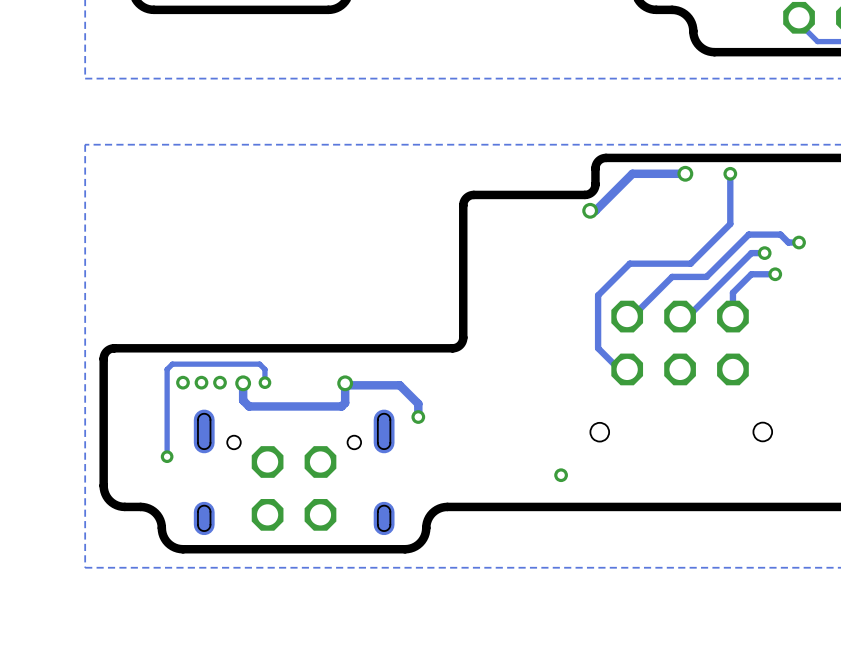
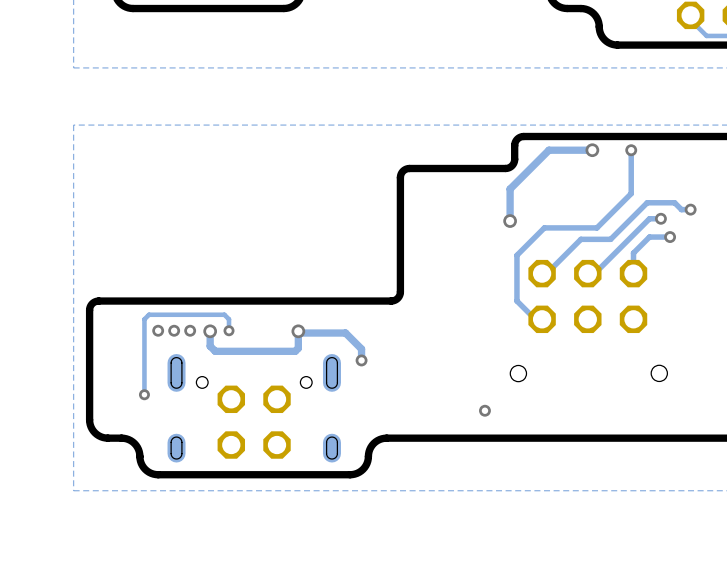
track: (635, 173) (632, 173) (595, 210) (590, 210) -> (548, 150) (510, 189) (510, 221)
via position: (590, 210) -> (510, 221)

